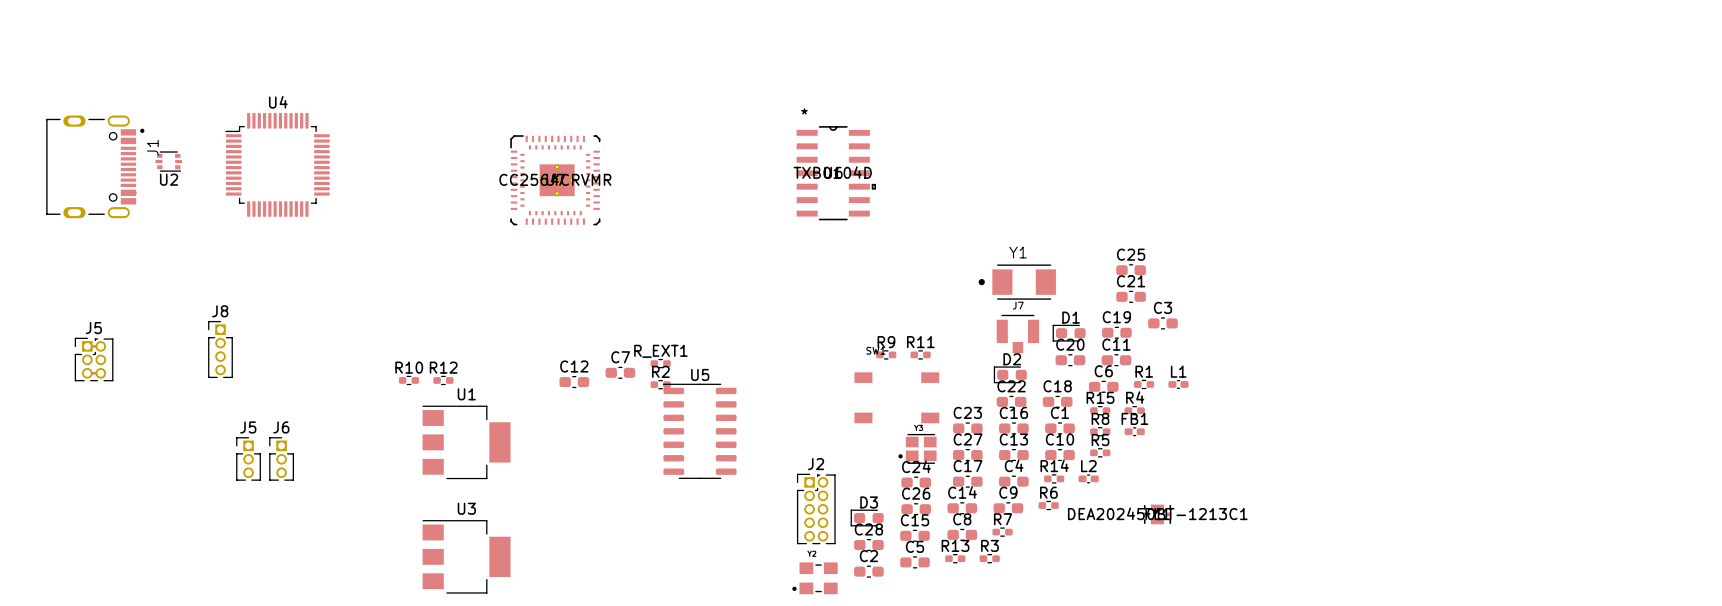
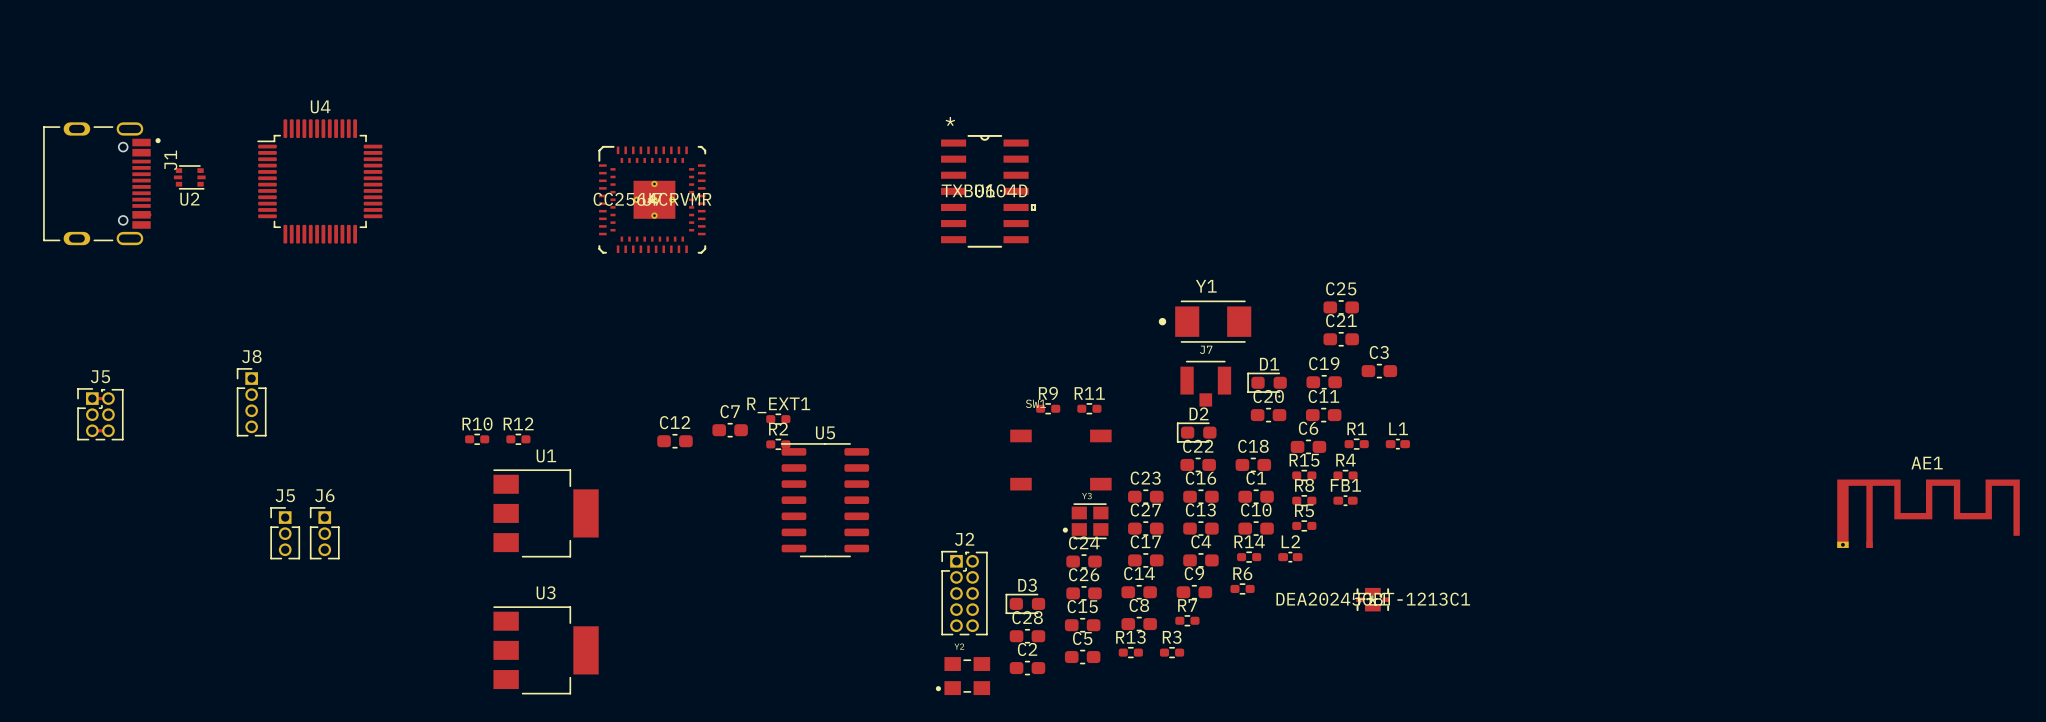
AE1: none -> (1928, 513)

